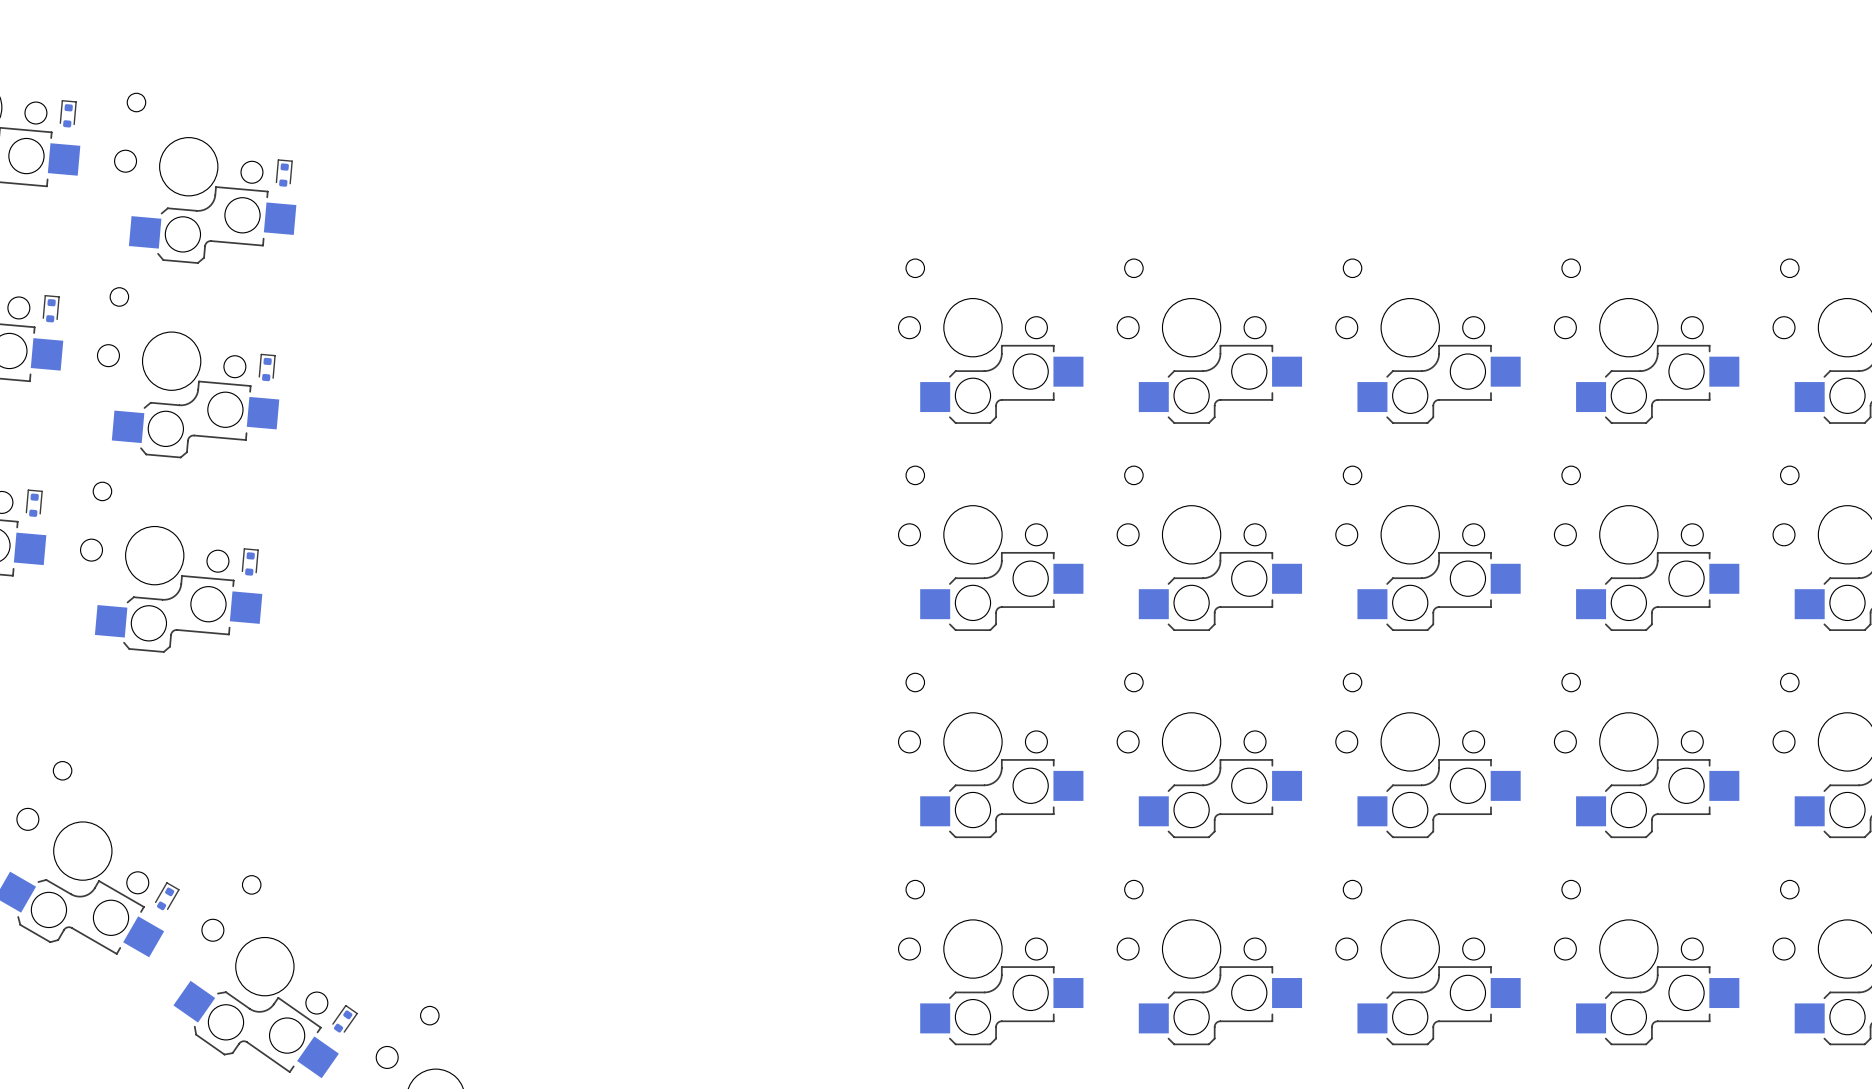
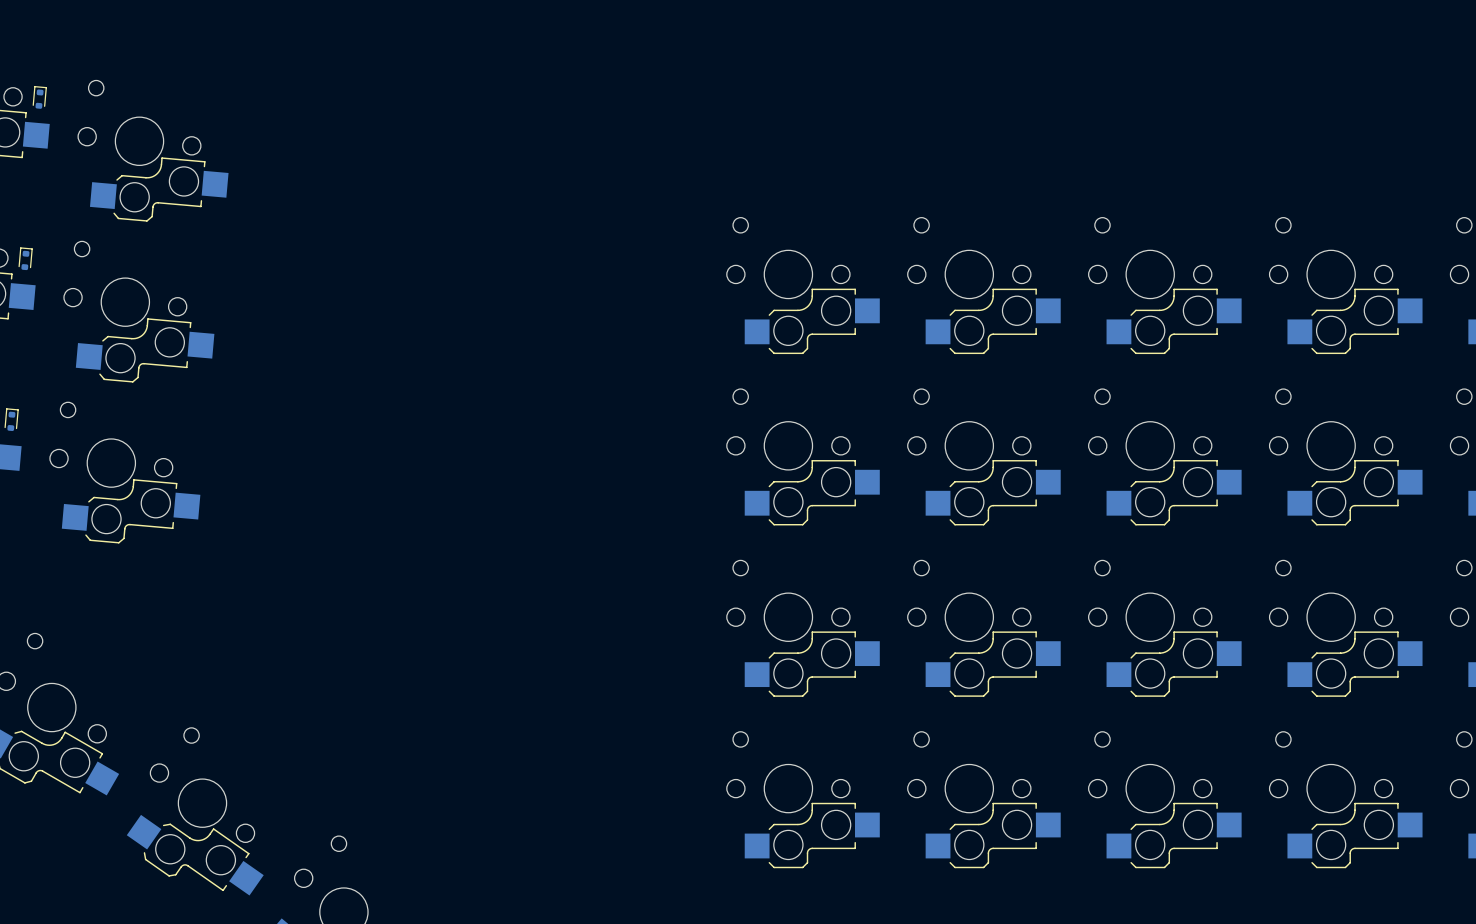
part: (284, 173) -> none
part: (267, 367) -> none
part: (250, 561) -> none
part: (167, 896) -> none
part: (345, 1018) -> none

